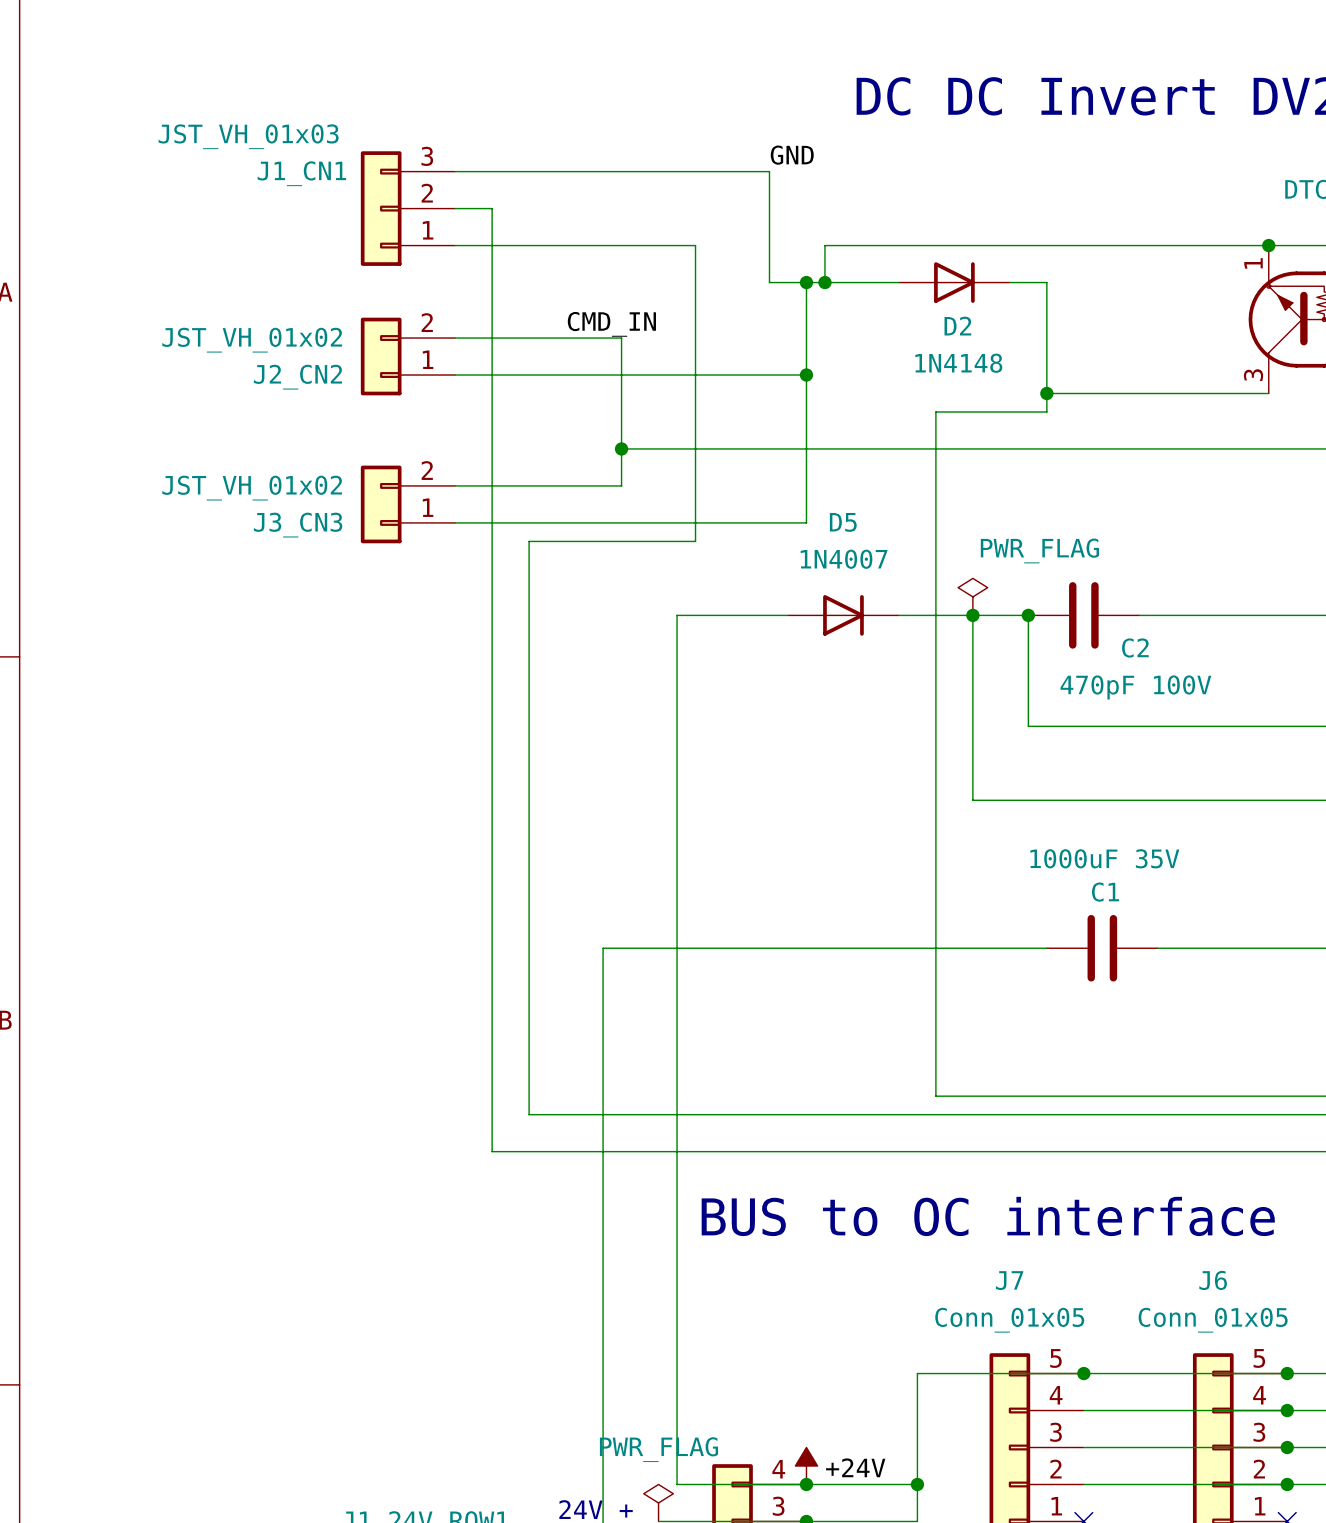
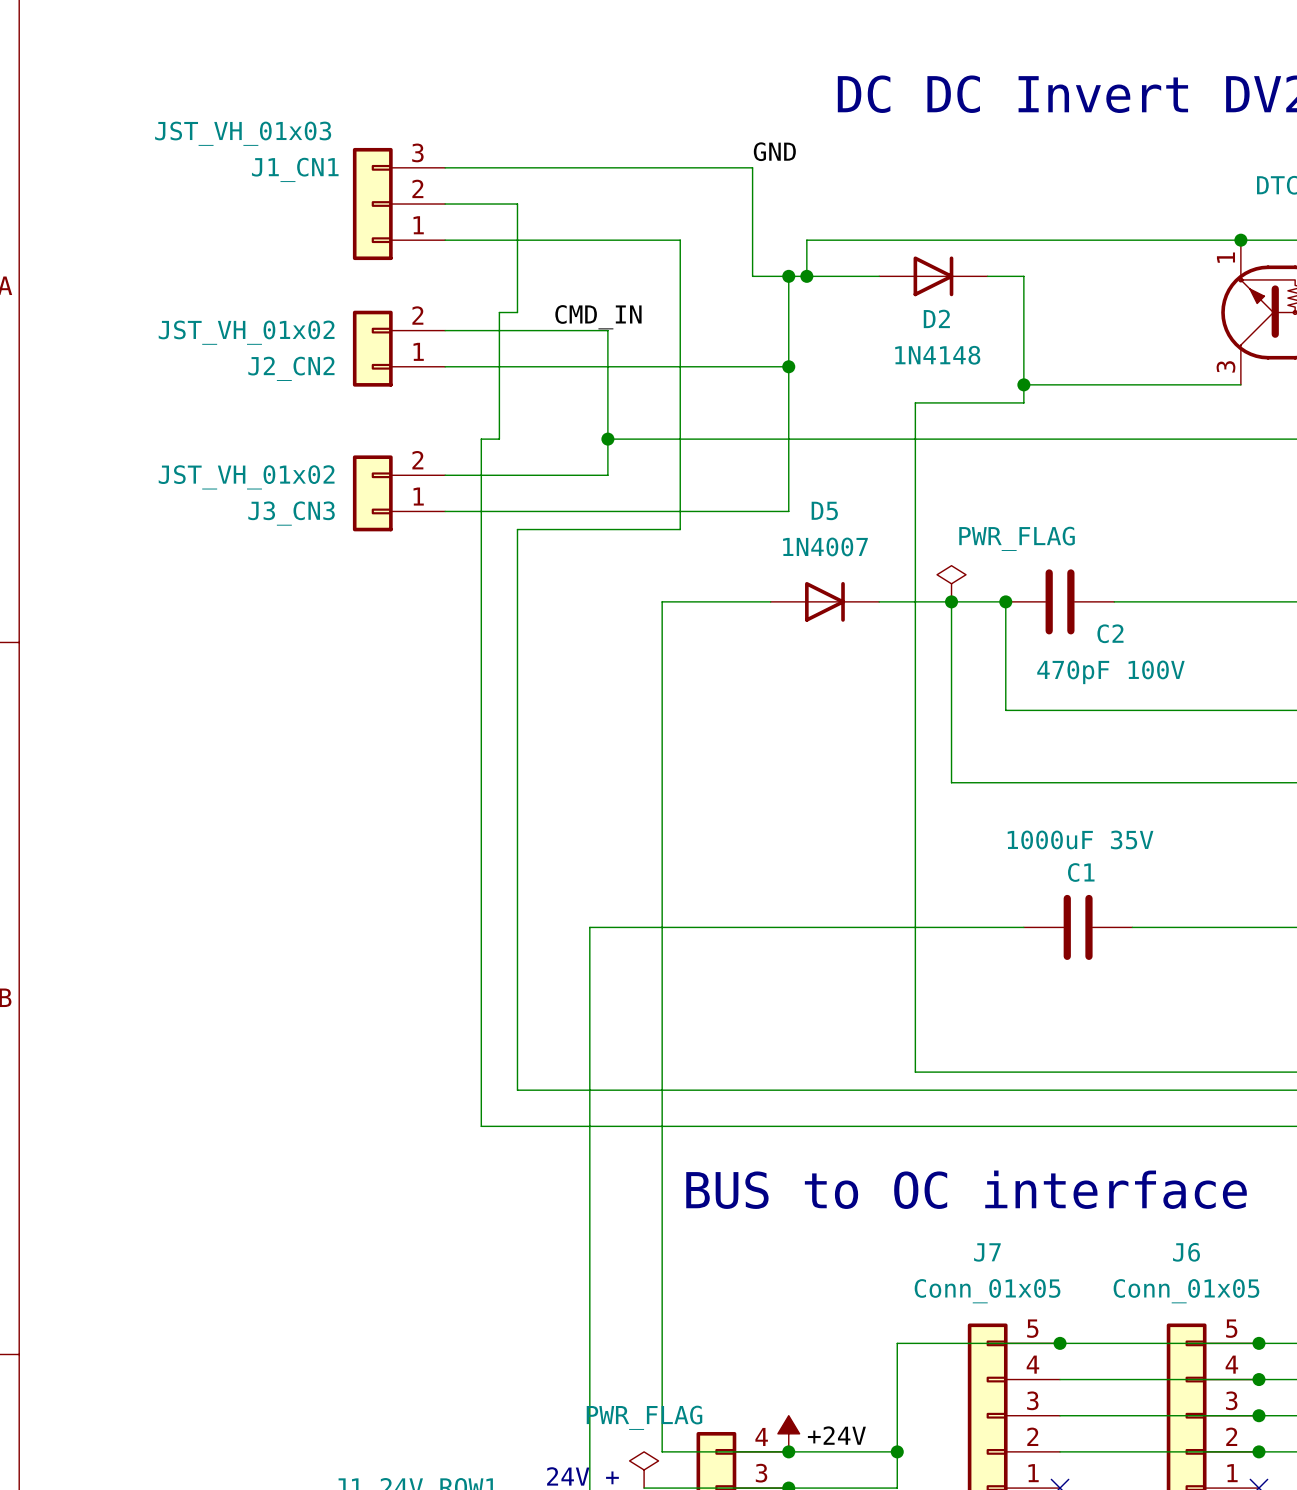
wire: (492, 208) (492, 448) -> (481, 204) (517, 204) (517, 312) (499, 312) (499, 439) (481, 439)

